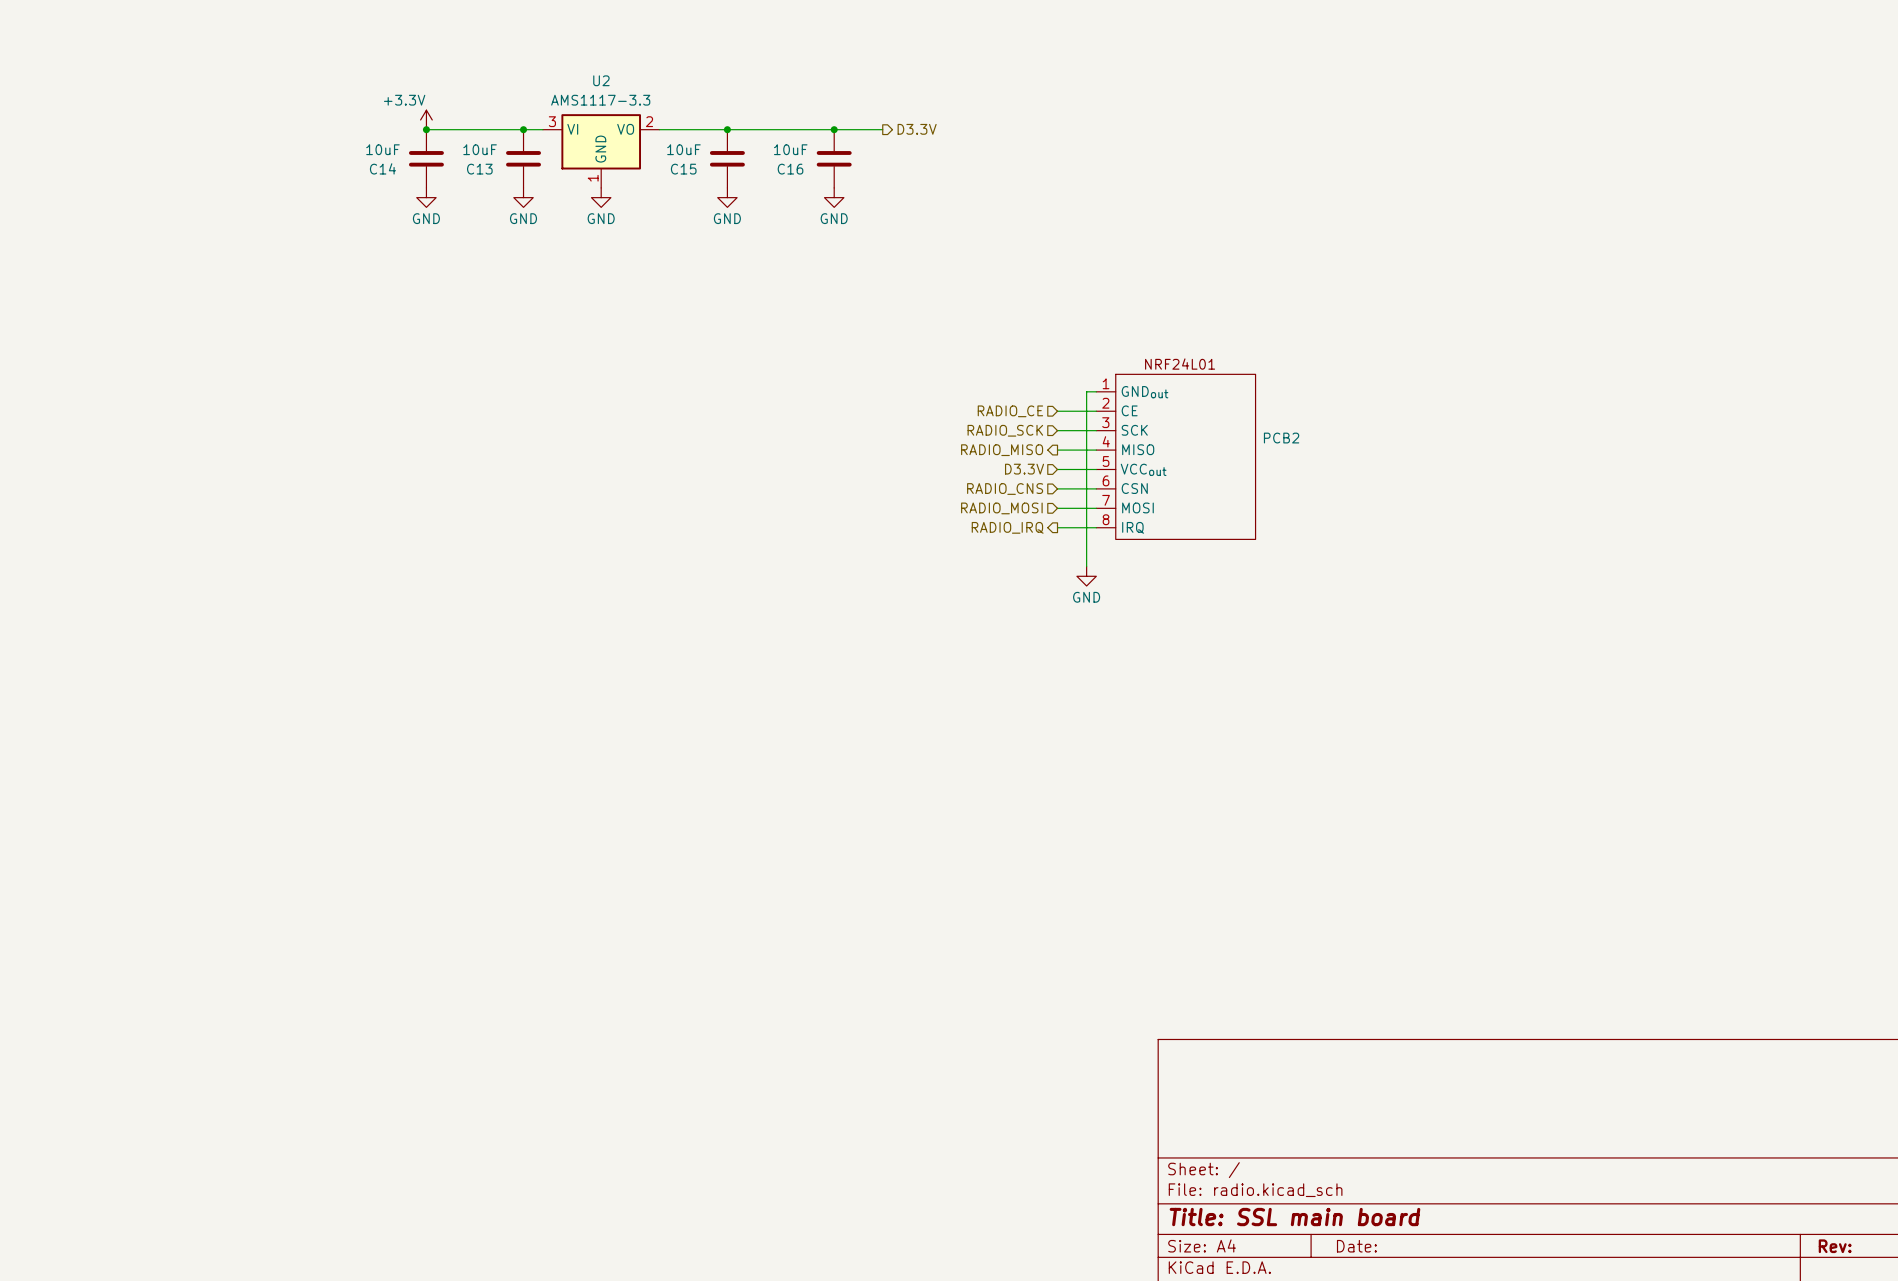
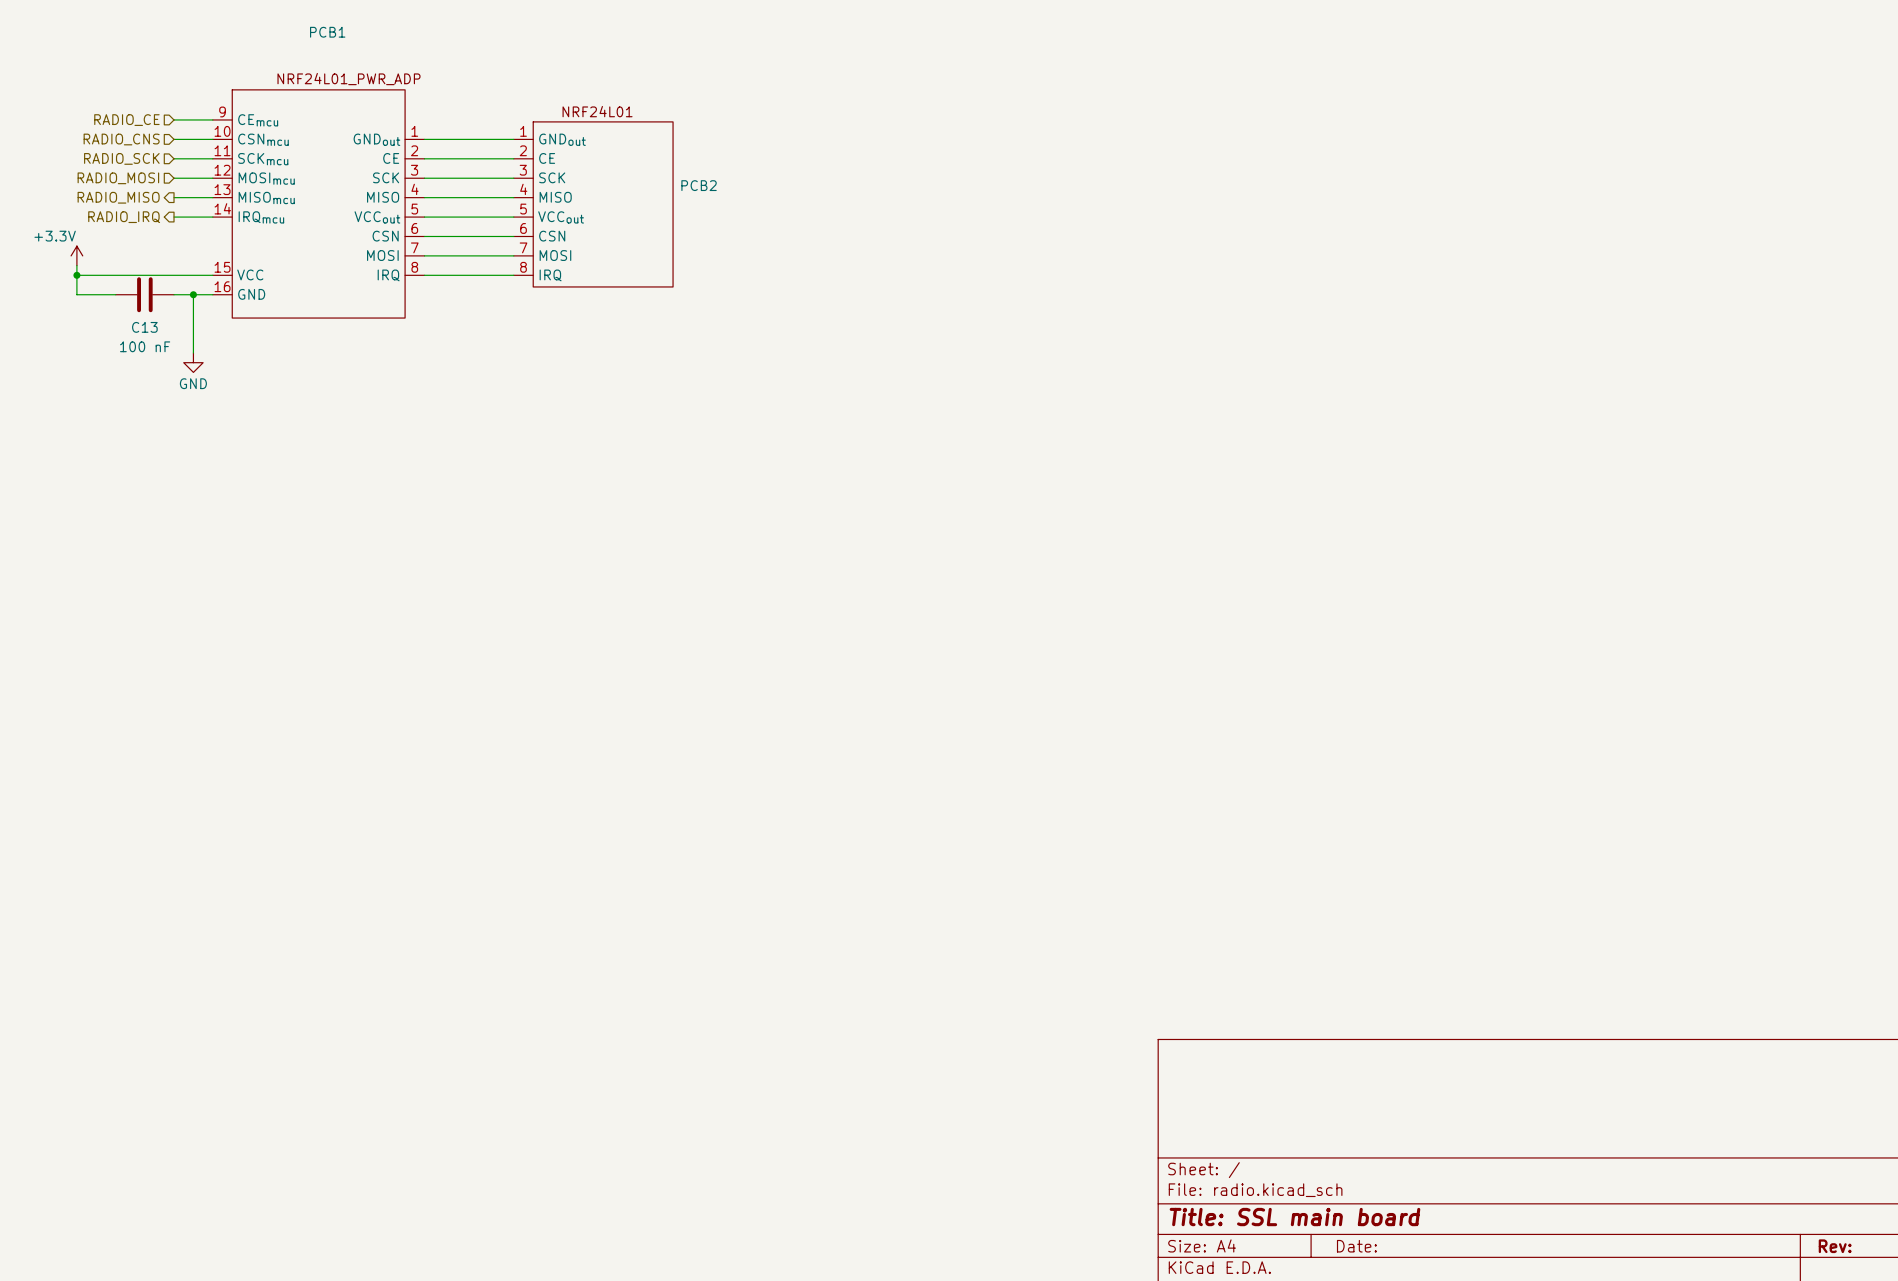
wire: none -> (174, 119) (212, 119)
power symbol: +3.3V (426, 119) -> none
hierarchical label: none -> RADIO_CE (126, 120)
wire: (426, 129) (542, 129) -> none
junction: (426, 129) -> none
junction: (523, 129) -> none
wire: (659, 129) (882, 129) -> none
junction: (727, 129) -> none
junction: (834, 129) -> none
hierarchical label: D3.3V (917, 129) -> none
hierarchical label: none -> RADIO_CNS (121, 139)
wire: none -> (174, 139) (212, 139)
wire: none -> (424, 139) (513, 139)
C13 value: 10uF (480, 149) -> 100 nF (145, 346)
U2: AMS1117-3.3 (601, 151) -> none
hierarchical label: none -> RADIO_SCK (121, 158)
wire: none -> (174, 158) (212, 158)
wire: none -> (424, 158) (513, 158)
C14: 10uF (426, 158) -> none
C13 rotation: 0° (523, 158) -> 90° clockwise (144, 294)
C13 position: (523, 158) -> (144, 294)
C15: 10uF (727, 158) -> none
C16: 10uF (834, 158) -> none
C13 name position: C13 (479, 169) -> C13 (144, 327)
hierarchical label: none -> RADIO_MOSI (118, 178)
wire: none -> (174, 178) (212, 178)
wire: none -> (424, 178) (513, 178)
hierarchical label: none -> RADIO_MISO (118, 197)
wire: none -> (174, 197) (212, 197)
wire: none -> (424, 197) (513, 197)
power symbol: GND (426, 197) -> none
power symbol: GND (523, 197) -> none
power symbol: GND (601, 197) -> none
power symbol: GND (727, 197) -> none
power symbol: GND (834, 197) -> none
PCB1: none -> (318, 203)
hierarchical label: none -> RADIO_IRQ (124, 217)
wire: none -> (174, 217) (212, 217)
wire: none -> (424, 217) (513, 217)
wire: none -> (424, 236) (513, 236)
power symbol: none -> +3.3V (76, 255)
wire: none -> (424, 255) (513, 255)
wire: none -> (76, 265) (76, 294) (115, 294)
wire: none -> (76, 275) (212, 275)
junction: none -> (76, 275)
wire: none -> (424, 275) (513, 275)
wire: none -> (174, 294) (212, 294)
wire: none -> (193, 294) (193, 352)
junction: none -> (193, 294)
power symbol: none -> GND (193, 362)
wire: (1096, 391) (1086, 391) (1086, 566) -> none
hierarchical label: RADIO_CE (1010, 411) -> none
wire: (1057, 411) (1096, 411) -> none
hierarchical label: RADIO_SCK (1005, 430) -> none
wire: (1057, 430) (1096, 430) -> none
hierarchical label: RADIO_MISO (1002, 450) -> none
wire: (1057, 450) (1096, 450) -> none
PCB2 position: (1175, 456) -> (593, 204)
hierarchical label: D3.3V (1024, 469) -> none
wire: (1057, 469) (1096, 469) -> none
wire: (1057, 488) (1096, 488) -> none
hierarchical label: RADIO_CNS (1005, 489) -> none
hierarchical label: RADIO_MOSI (1001, 508) -> none
wire: (1057, 508) (1096, 508) -> none
hierarchical label: RADIO_IRQ (1007, 527) -> none
wire: (1057, 527) (1096, 527) -> none
power symbol: GND (1086, 576) -> none

